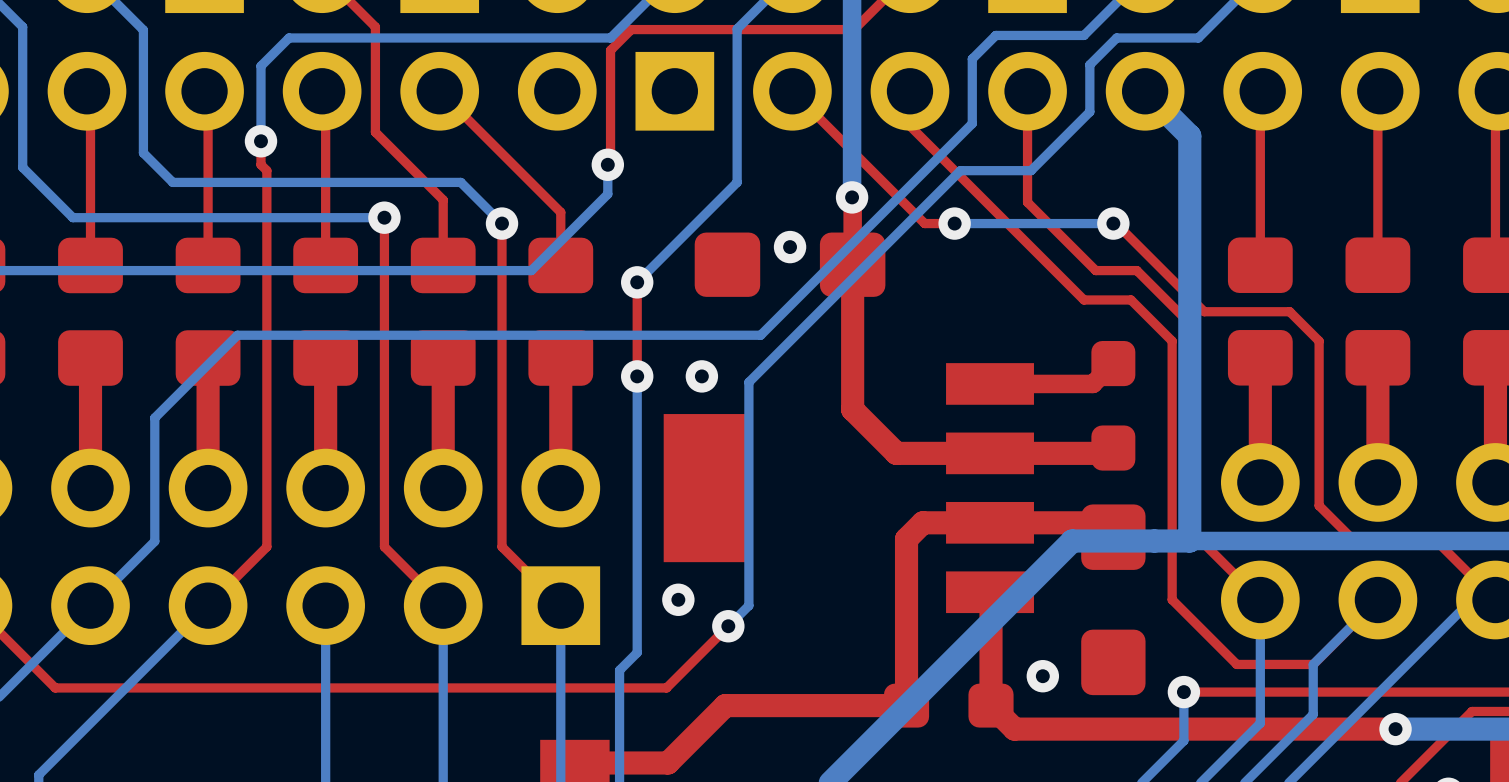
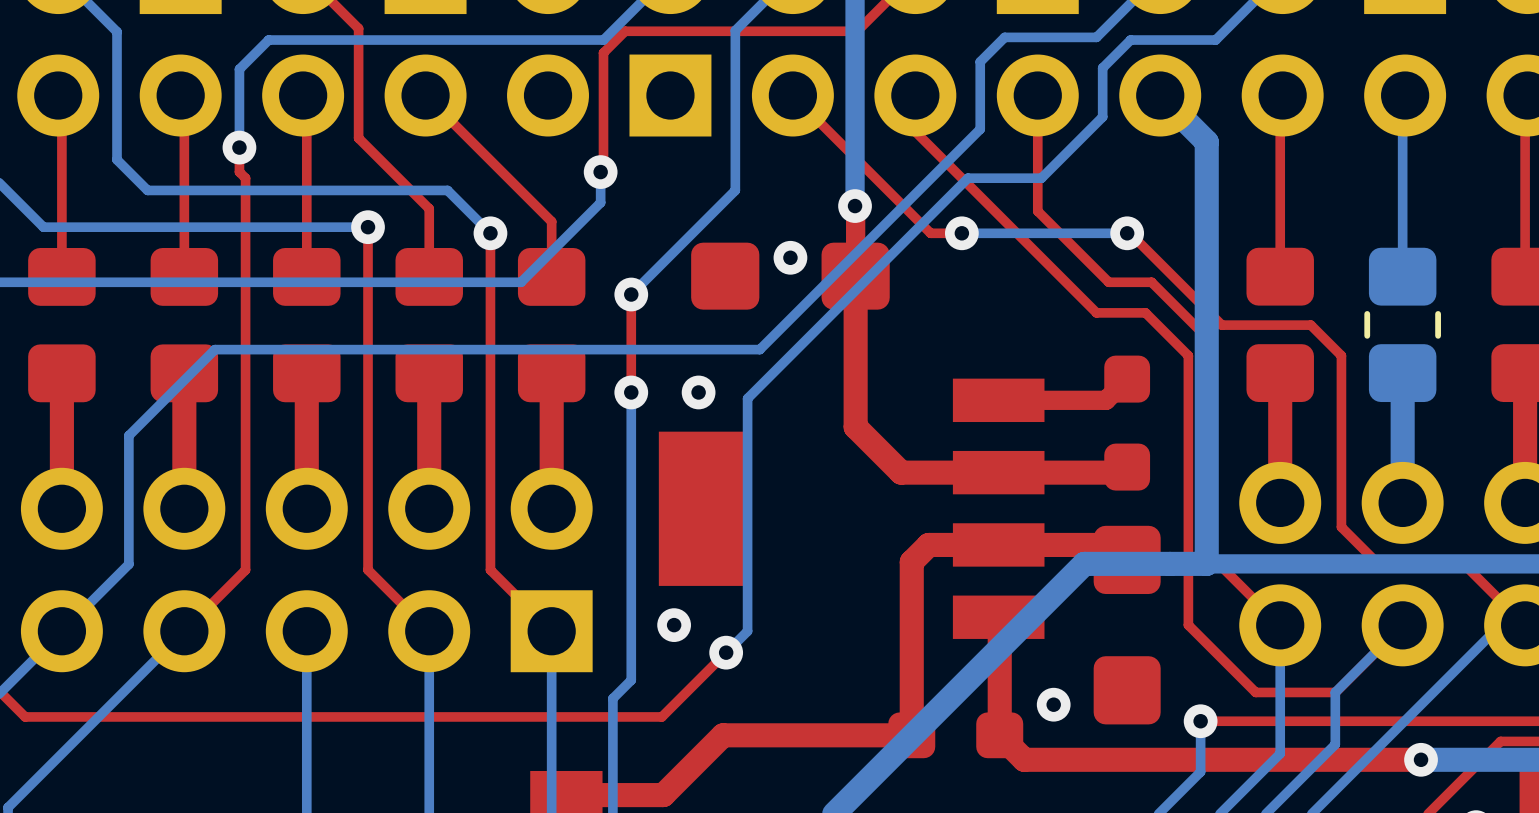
top track: (1380, 91) (1377, 93) (1377, 265) -> none
bottom track: none -> (1402, 97) (1402, 276)
part side: top (1377, 311) -> bottom (1402, 324)
top track: (1377, 357) (1377, 482) -> none
bottom track: none -> (1402, 373) (1402, 502)

